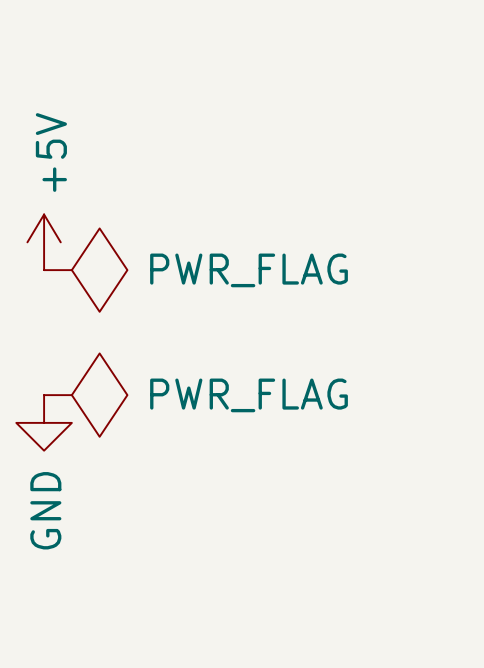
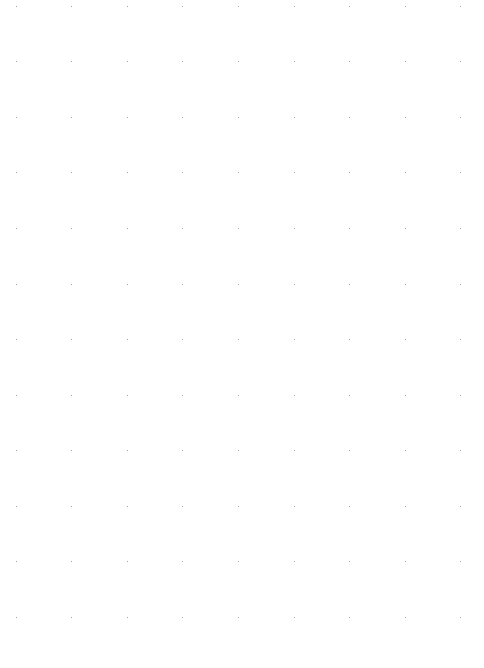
power symbol: +5V (44, 242) -> none
power symbol: PWR_FLAG (85, 270) -> none
power symbol: PWR_FLAG (85, 395) -> none
power symbol: GND (44, 422) -> none

